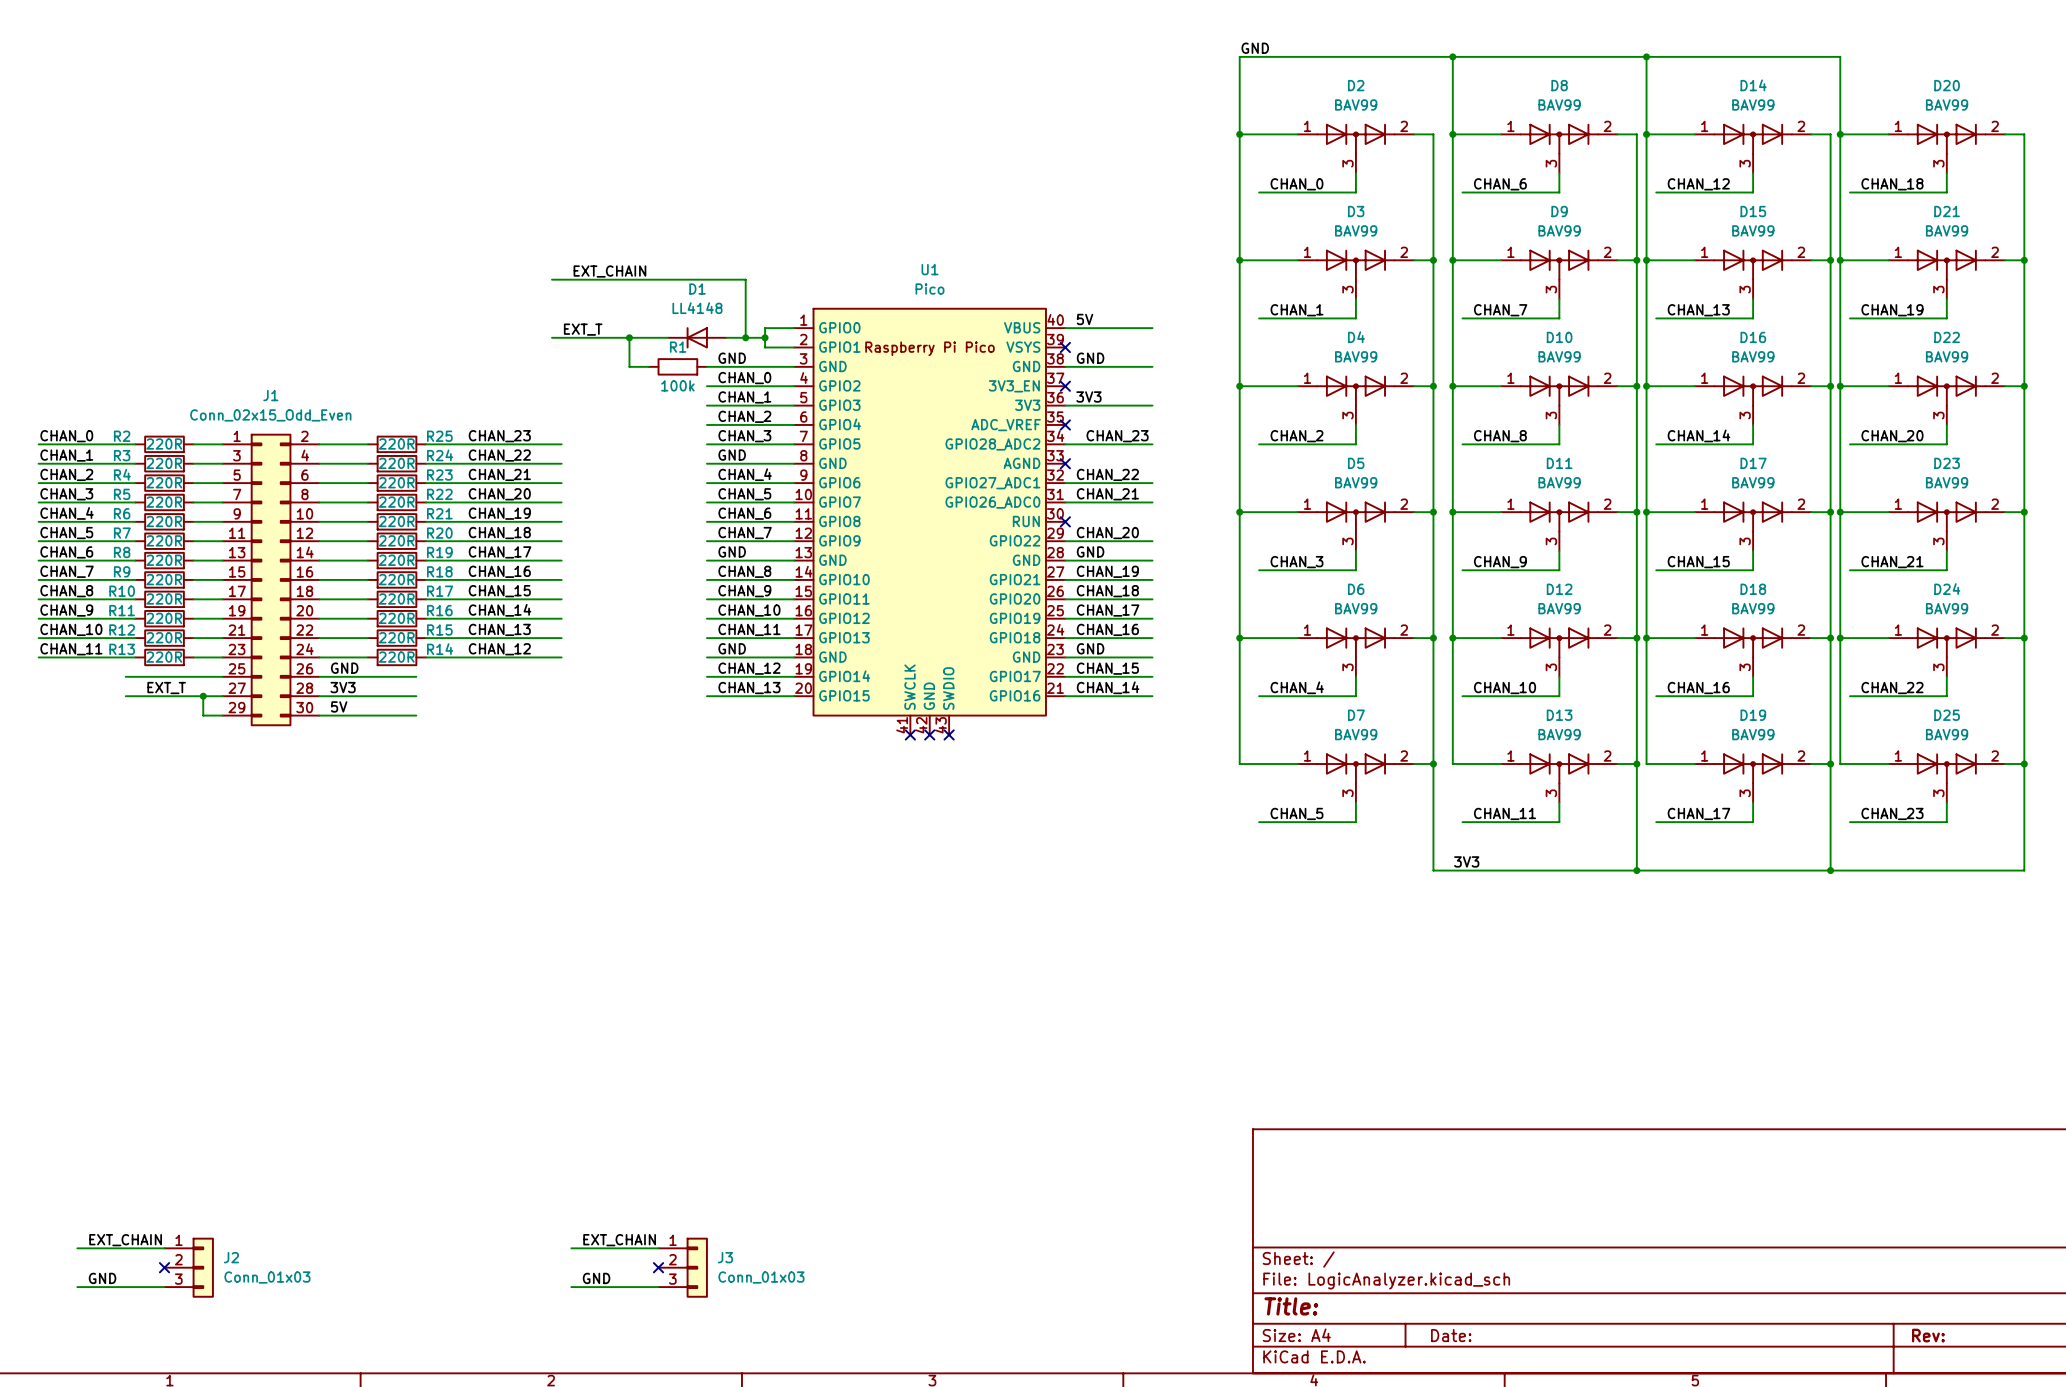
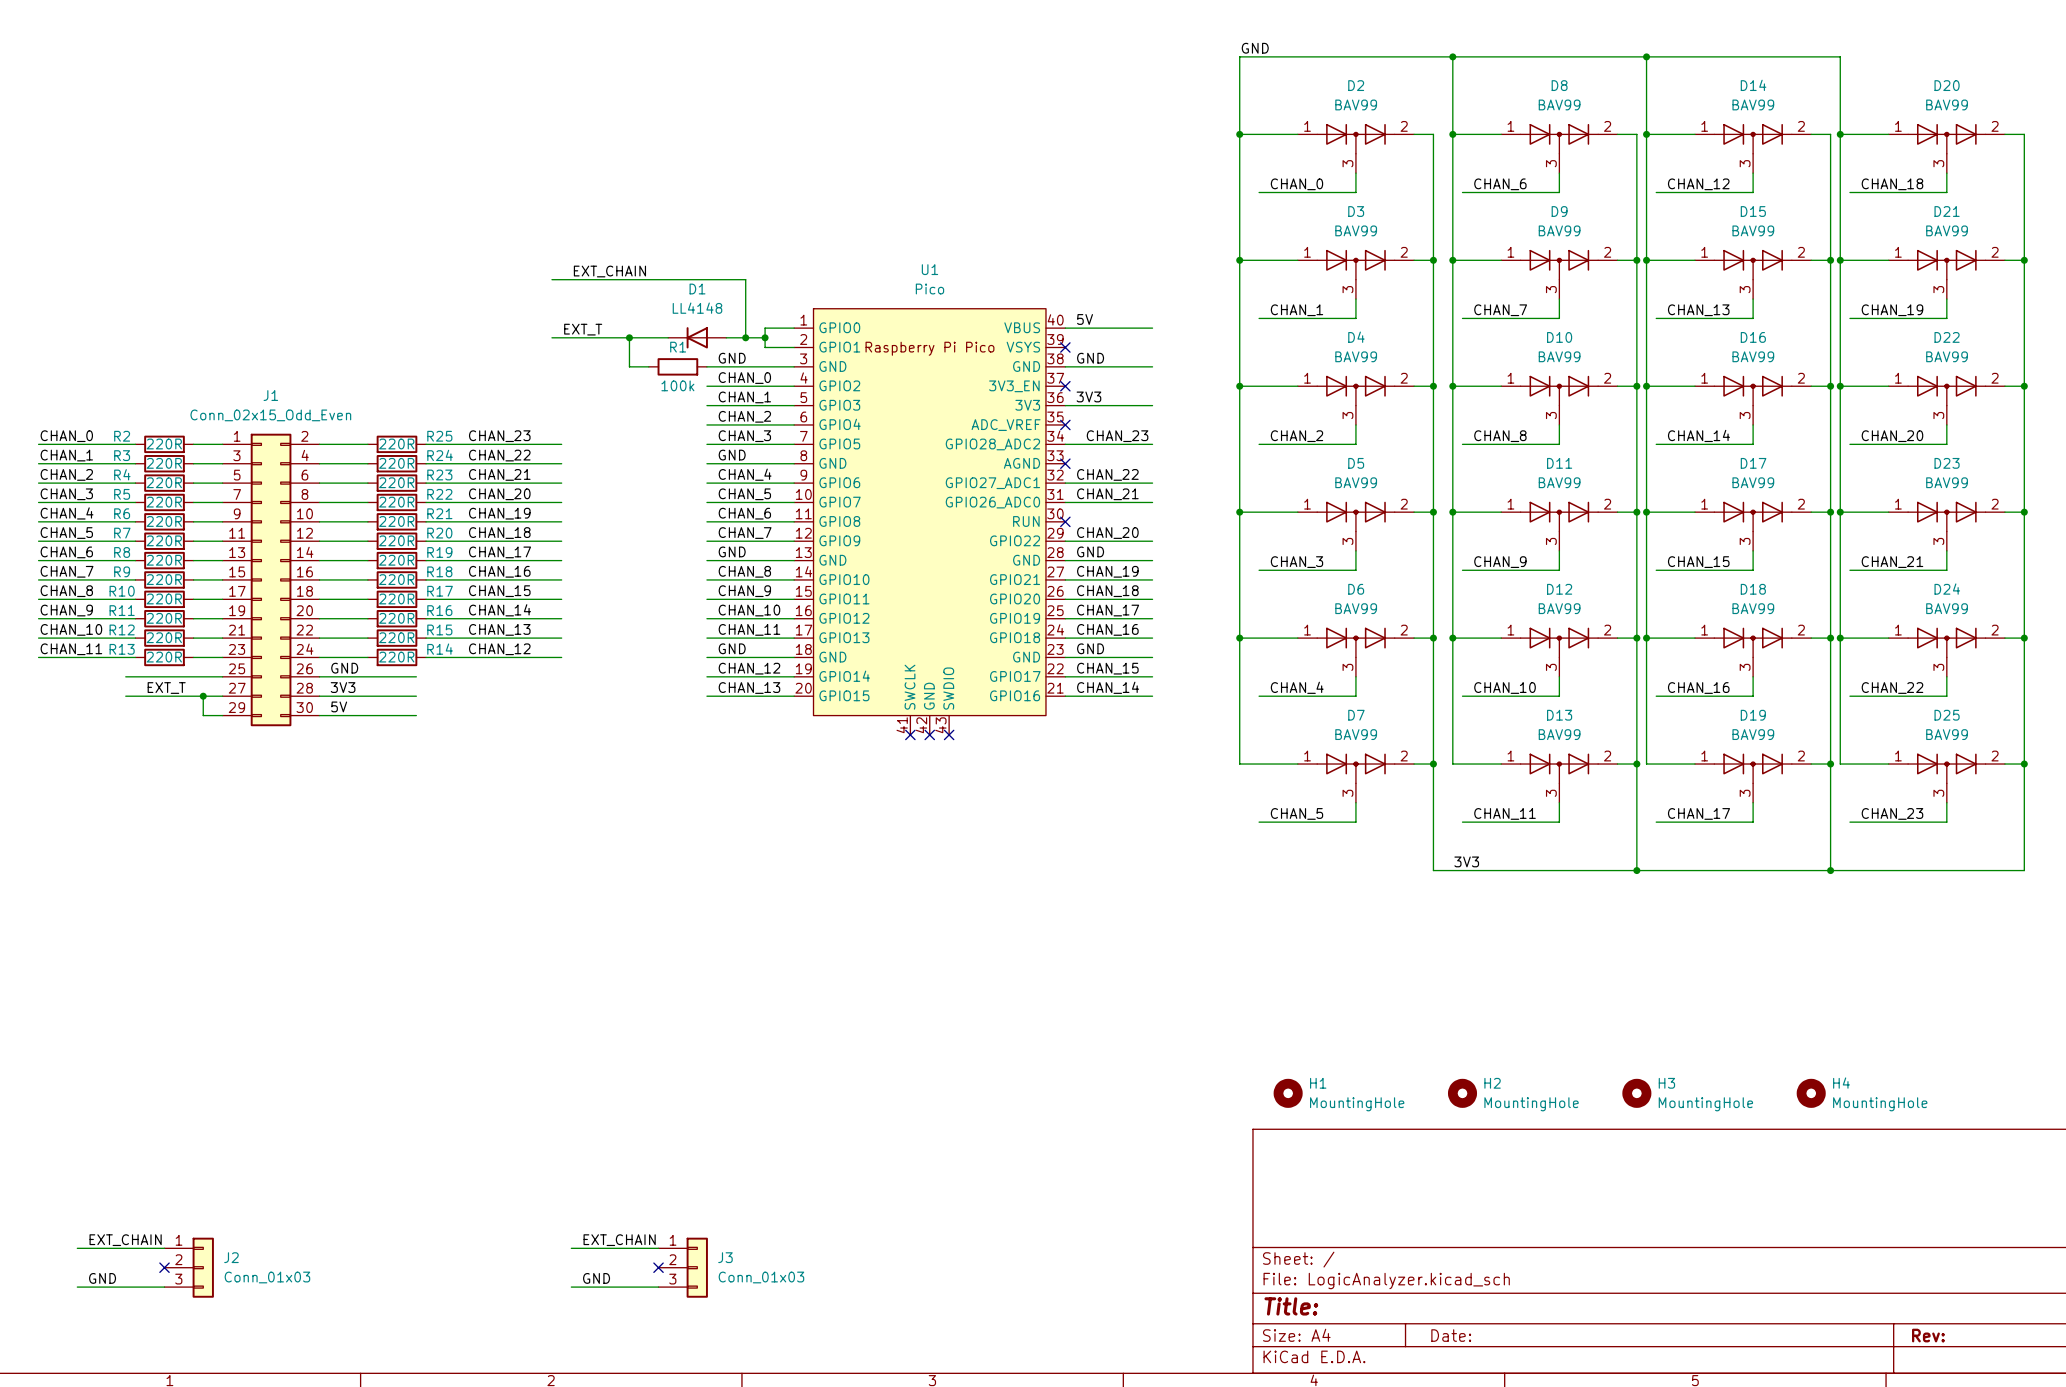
H1: none -> MountingHole (1288, 1093)
H2: none -> MountingHole (1462, 1093)
H3: none -> MountingHole (1636, 1093)
H4: none -> MountingHole (1811, 1093)

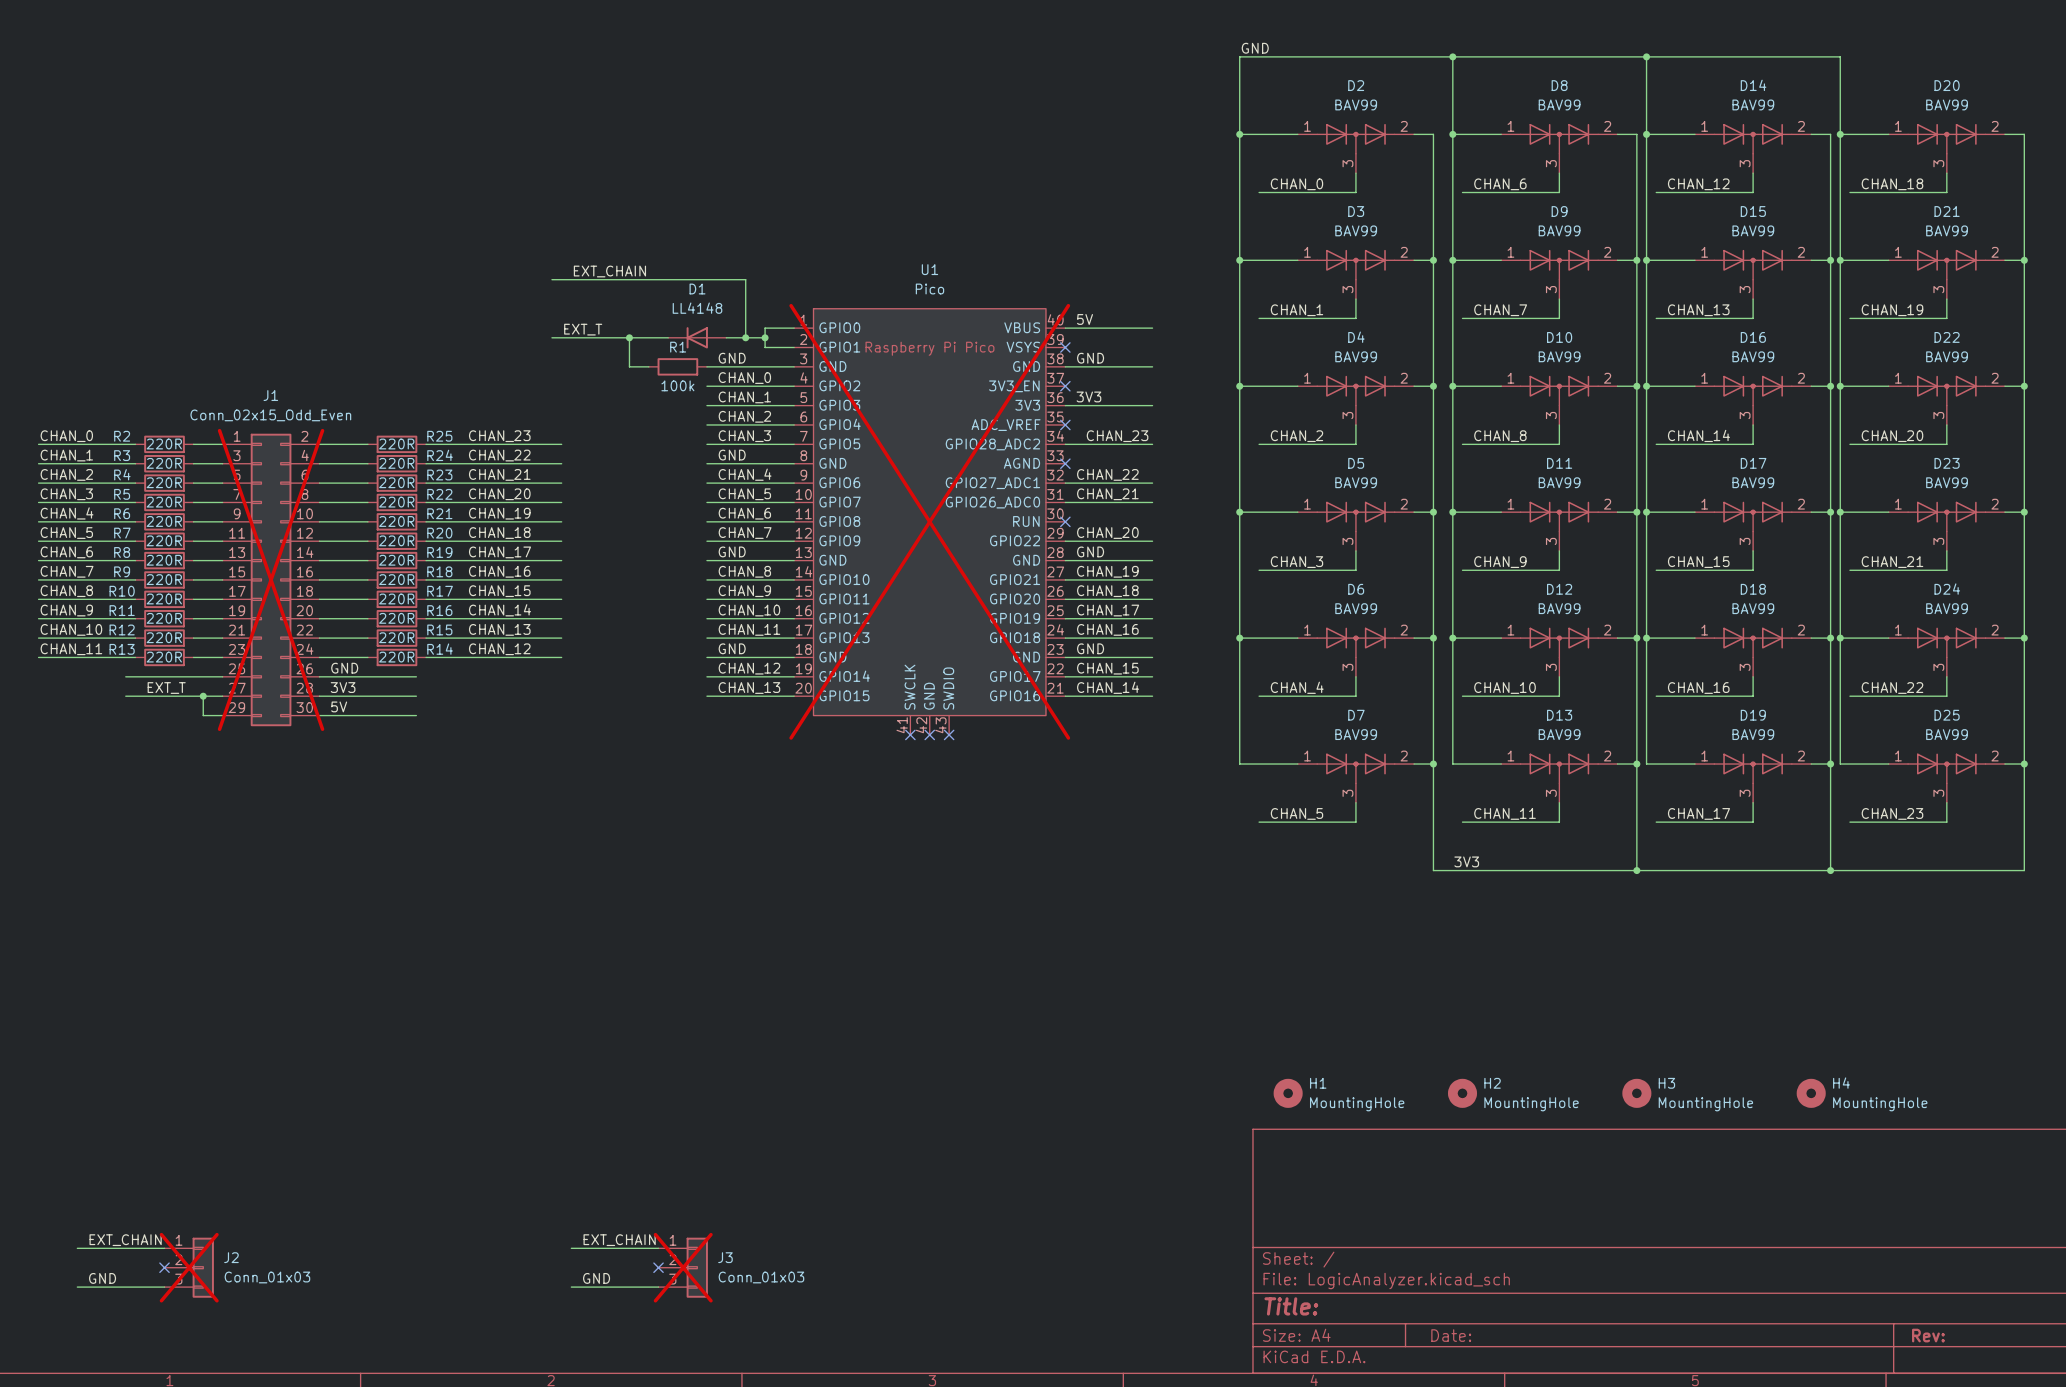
U1 do-not-place cross: none -> (929, 521)
J1 do-not-place cross: none -> (271, 579)
J2 do-not-place cross: none -> (189, 1267)
J3 do-not-place cross: none -> (683, 1267)

